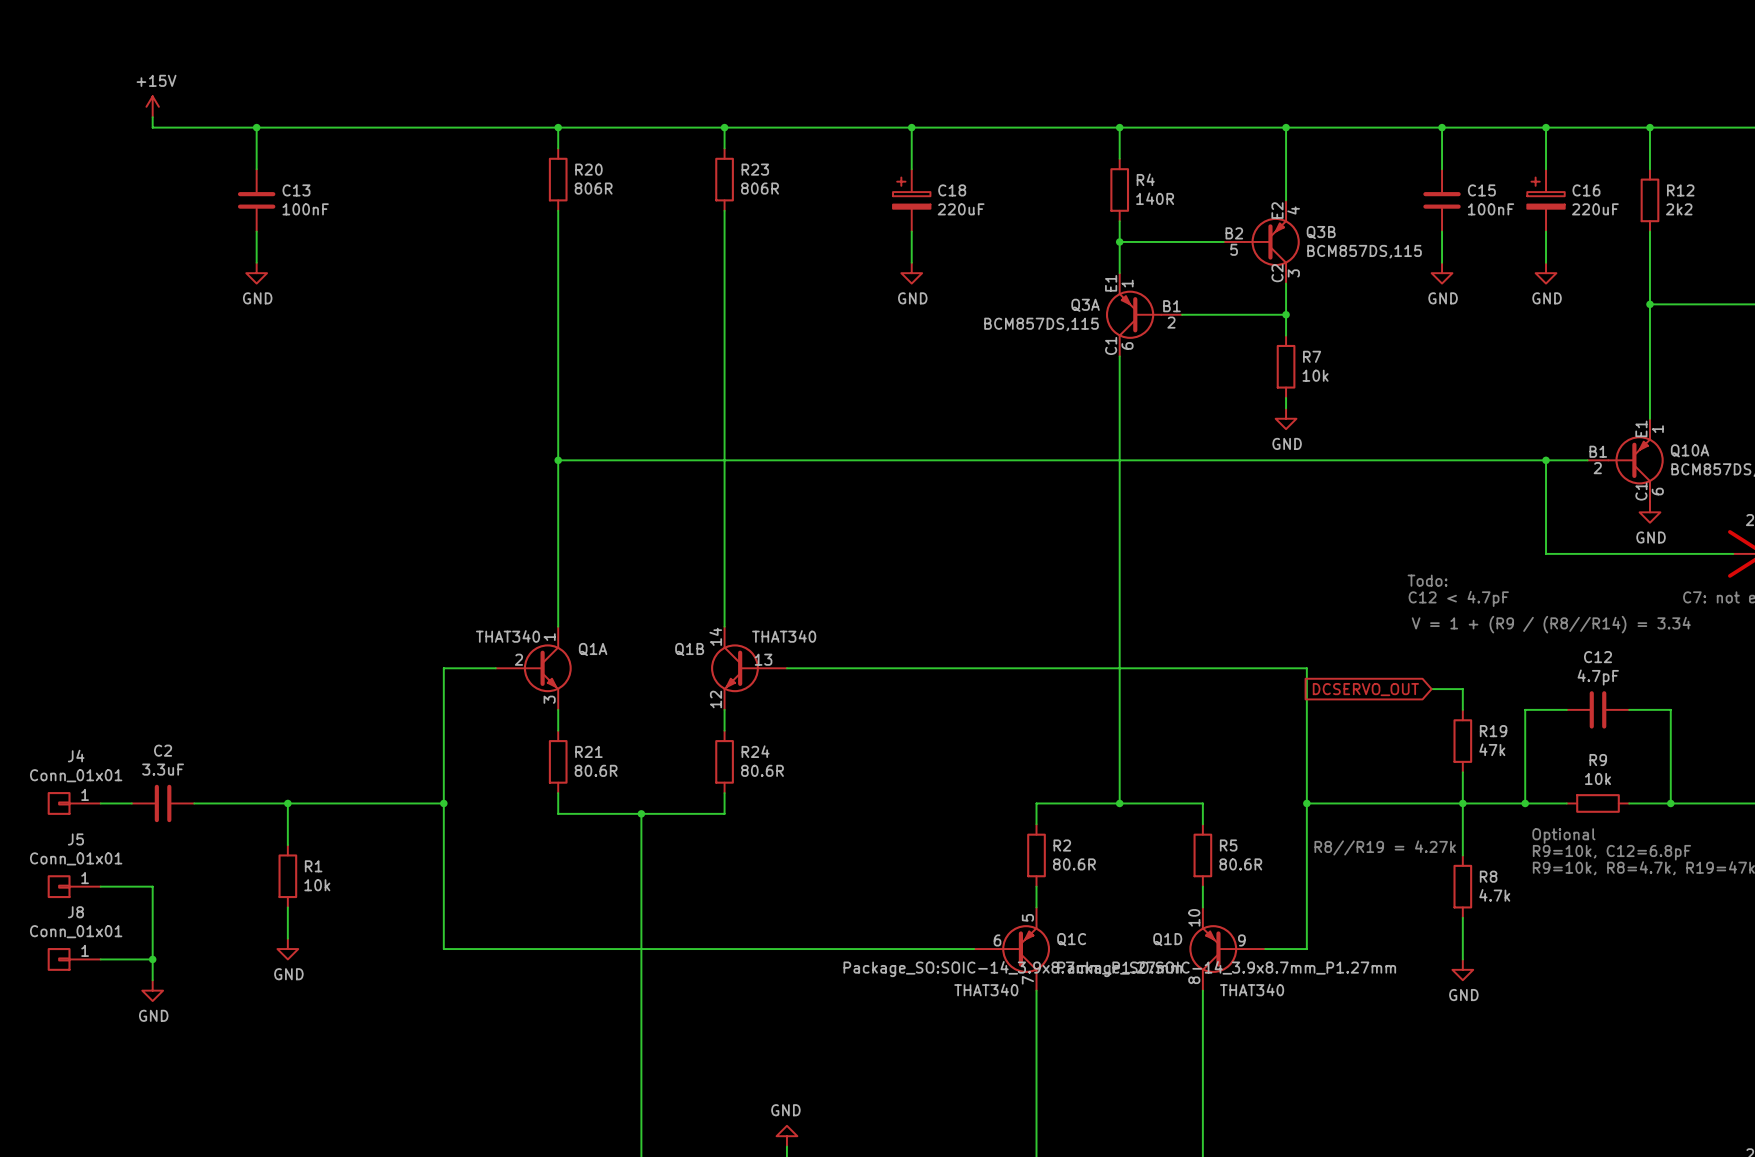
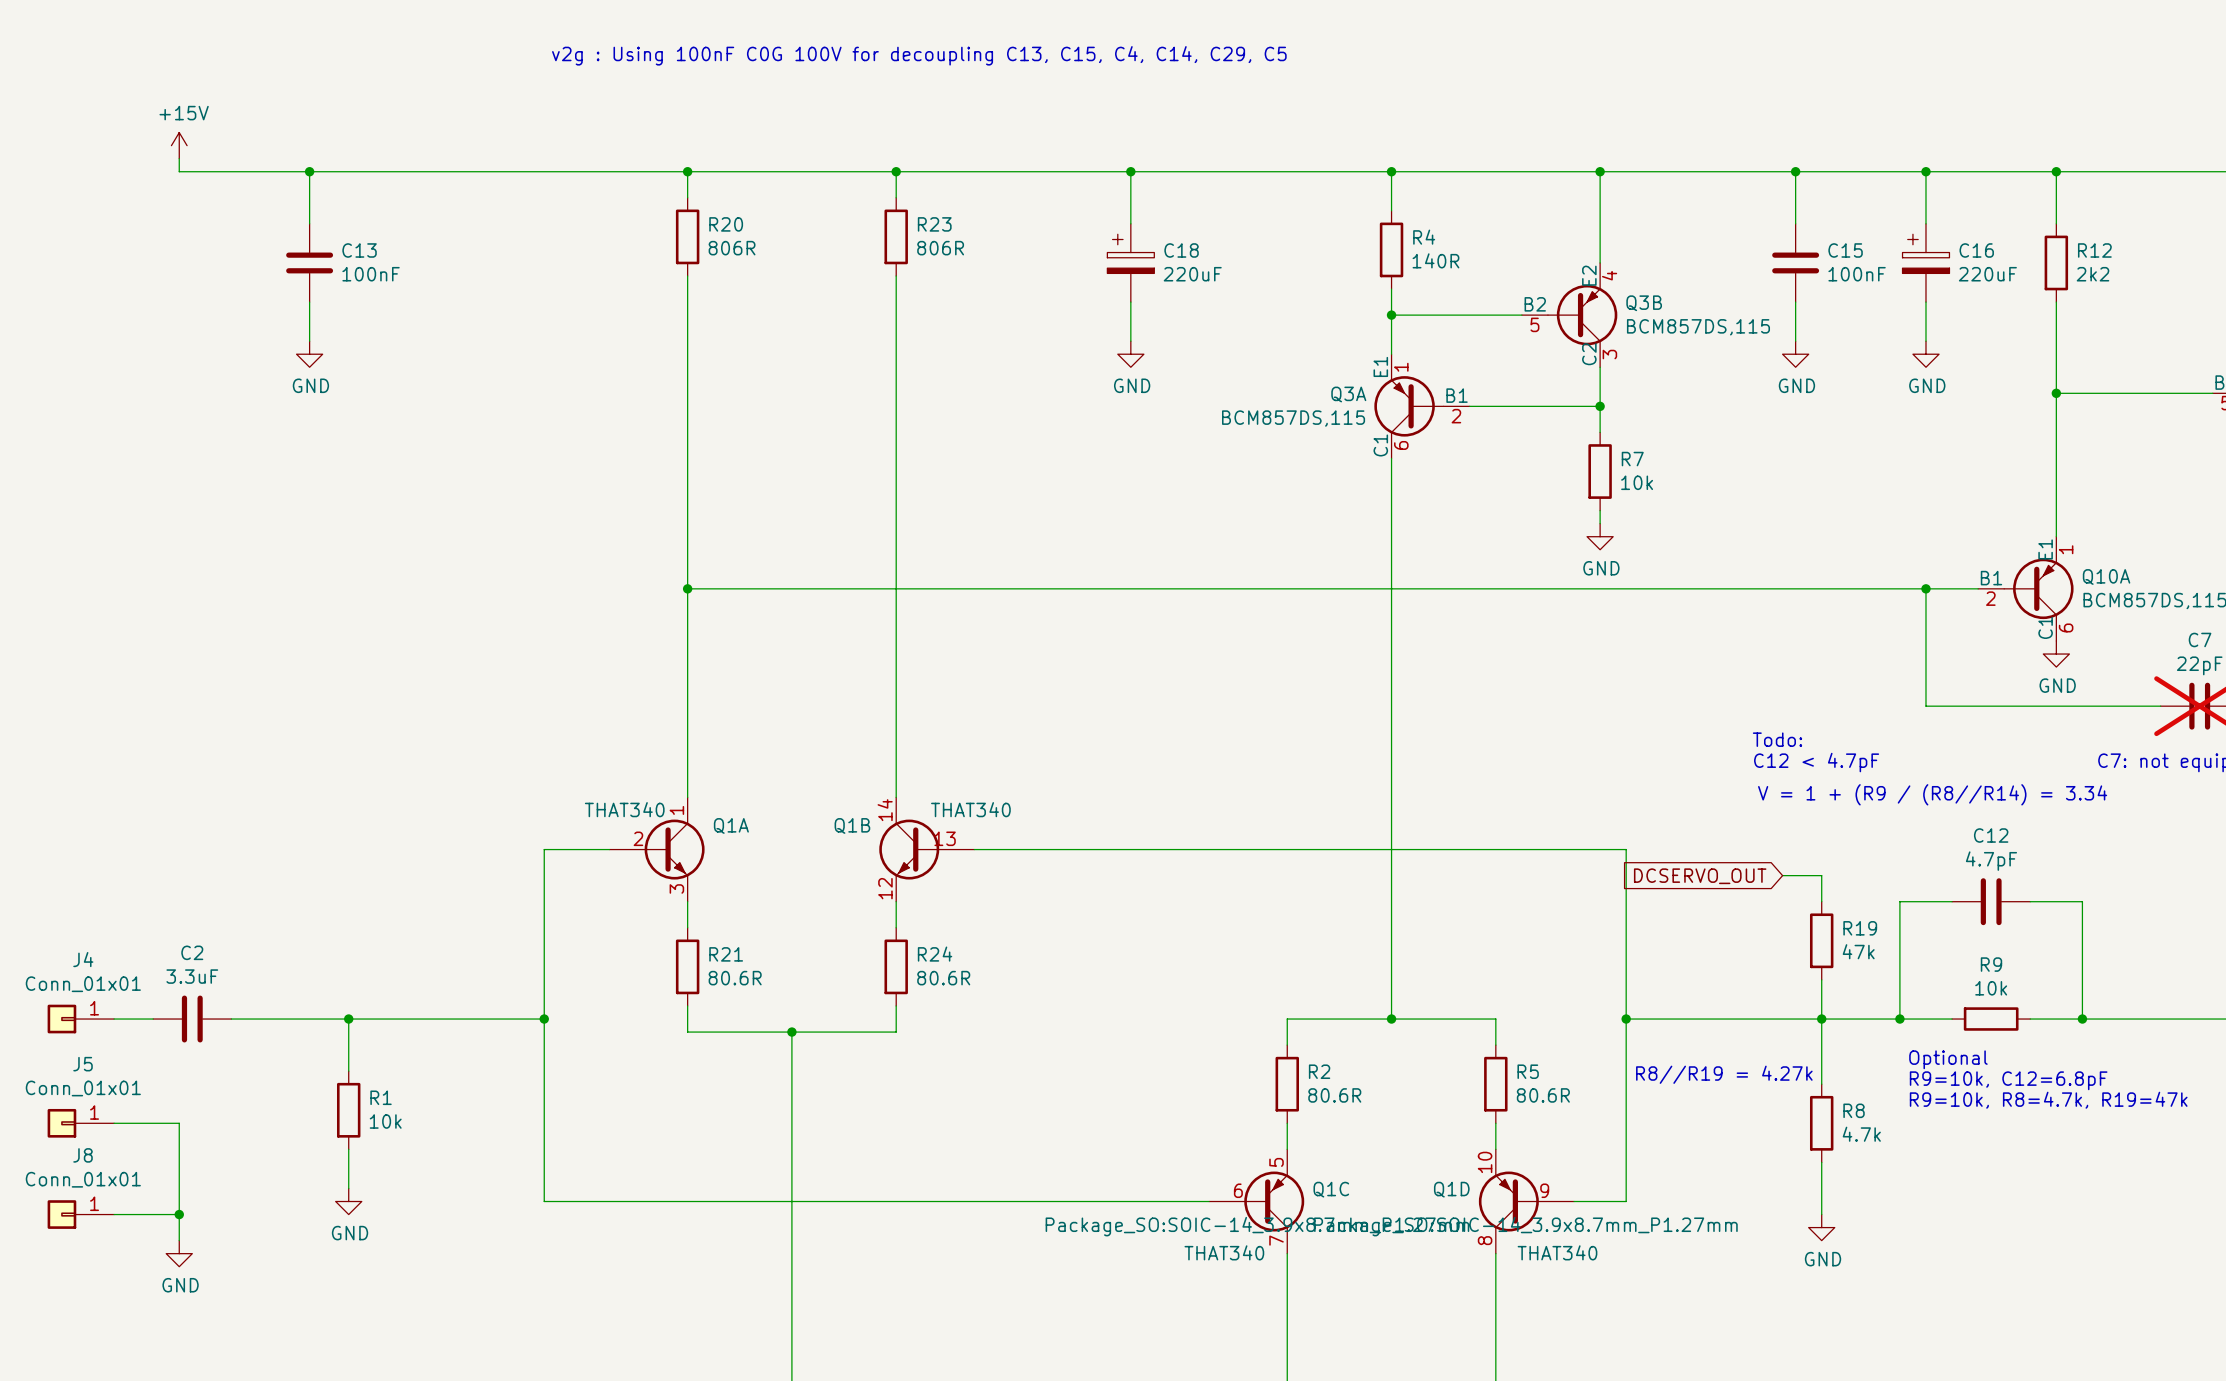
text: none -> v2g : Using 100nF C0G 100V for decoupling C13, C15, C4, C14, C29, C5 (919, 55)

